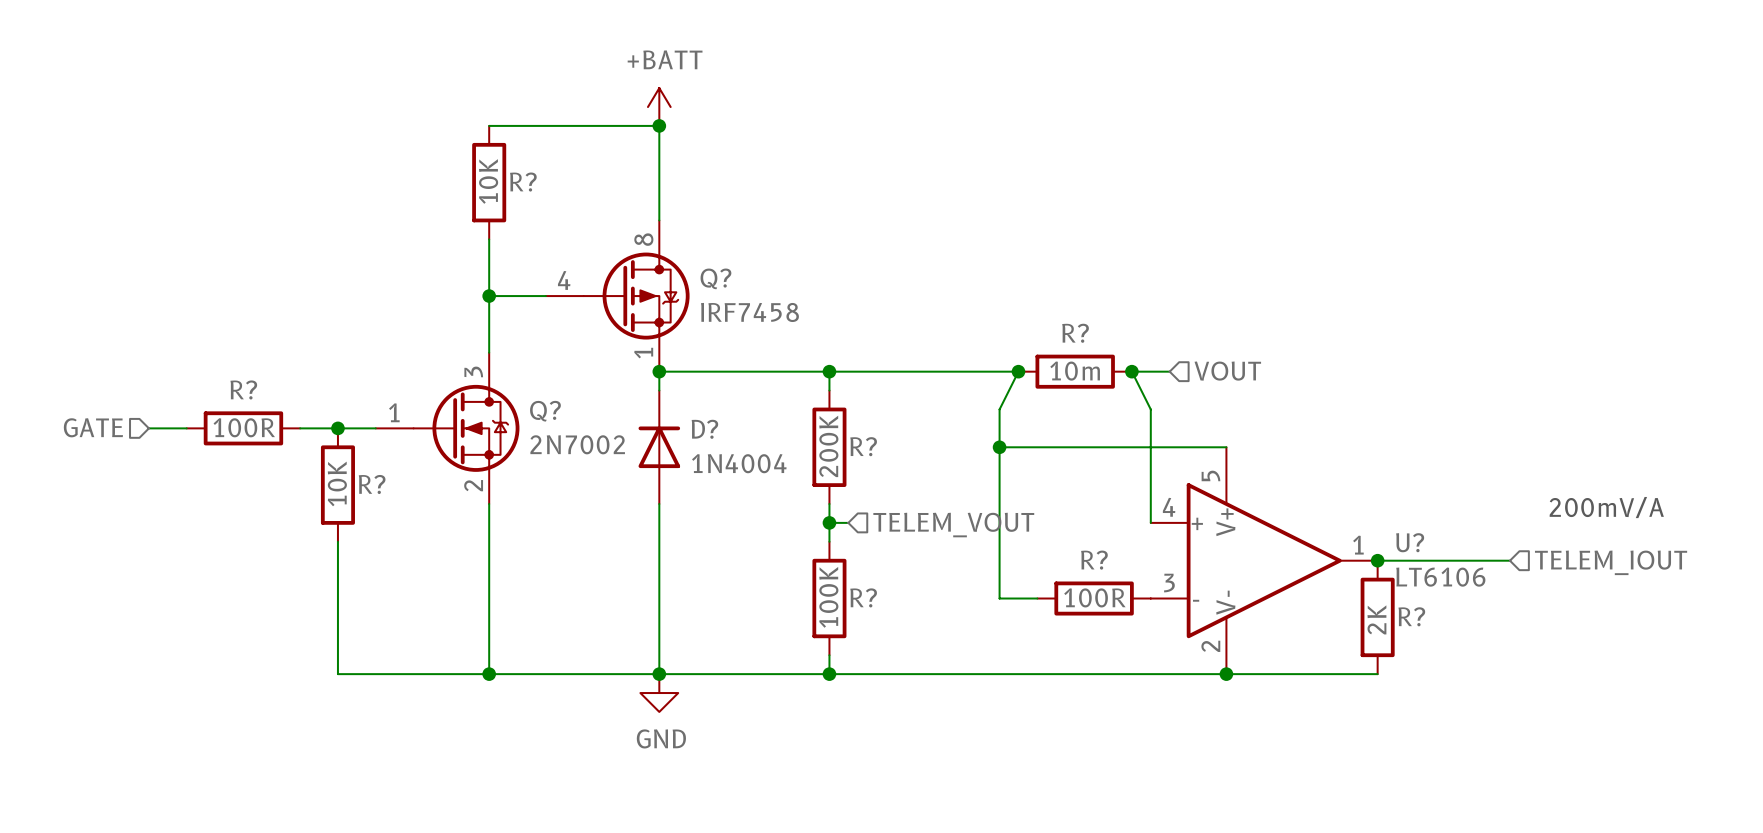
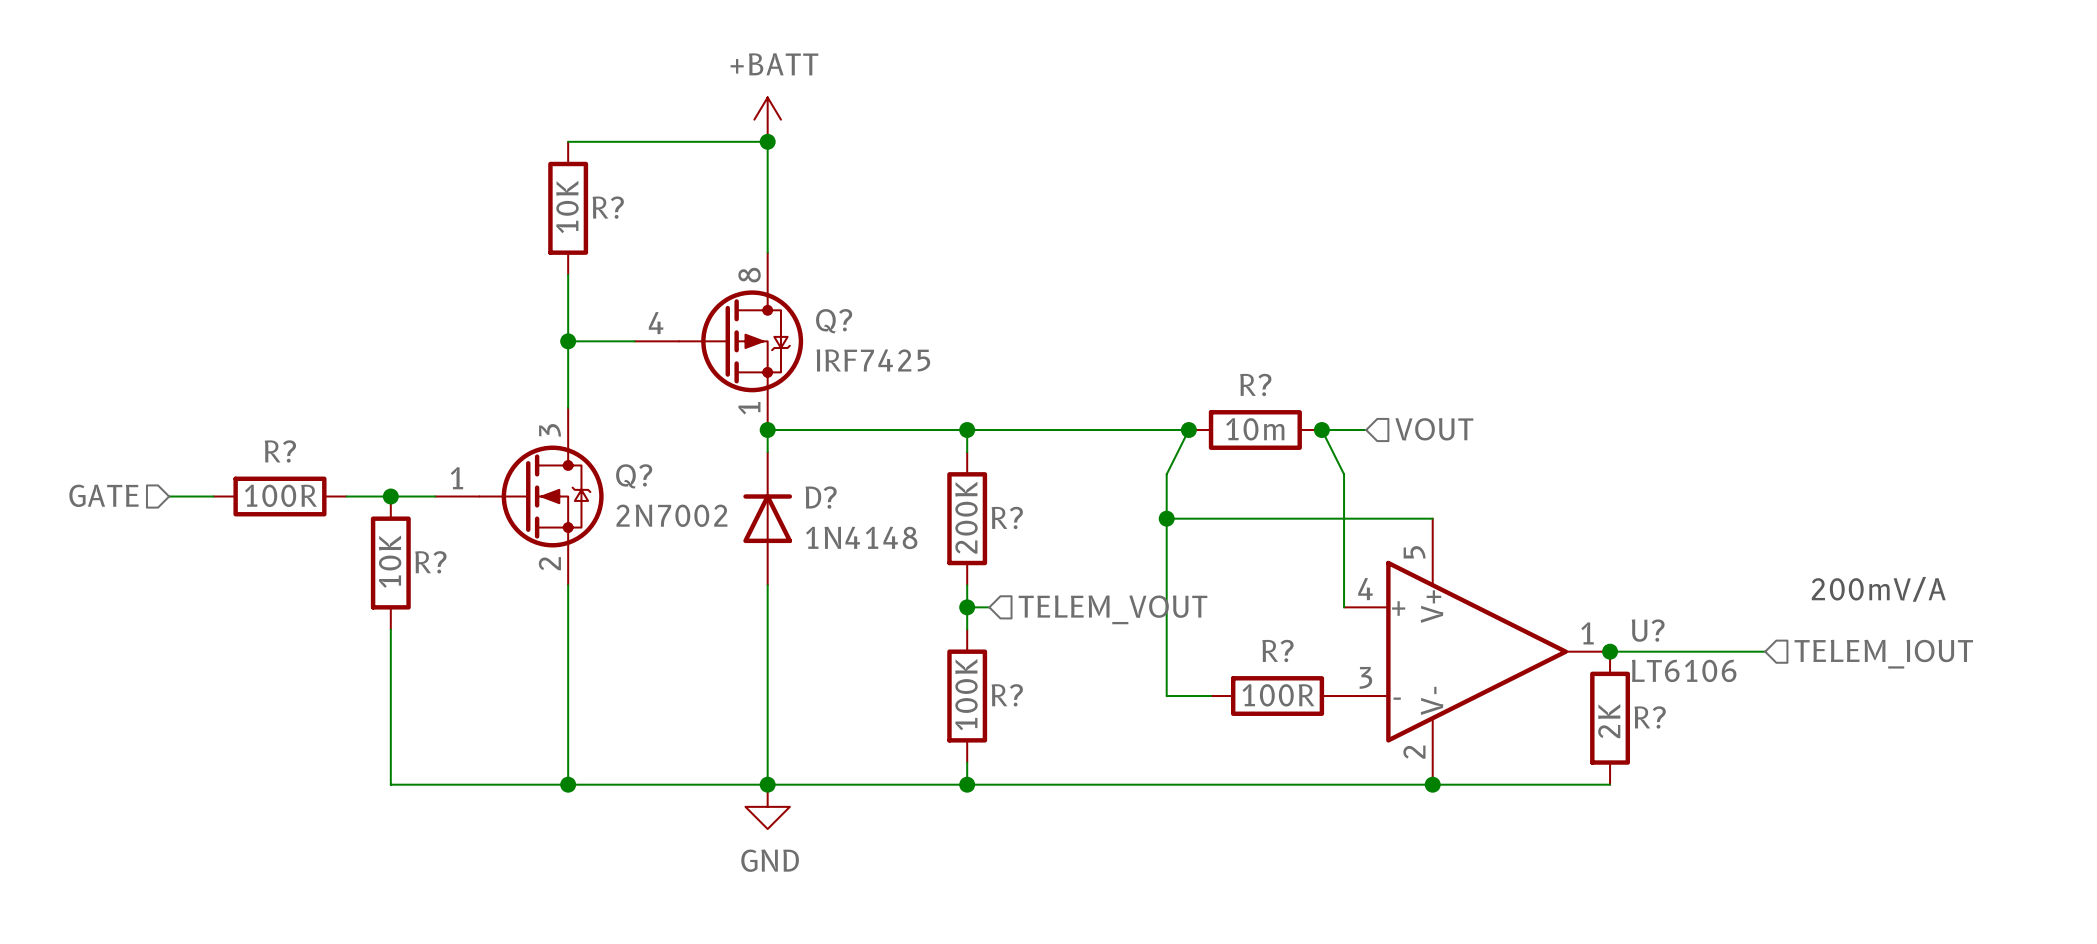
Q? value: IRF7458 (749, 312) -> IRF7425 (873, 360)
D? value: 1N4004 (739, 463) -> 1N4148 (861, 537)

